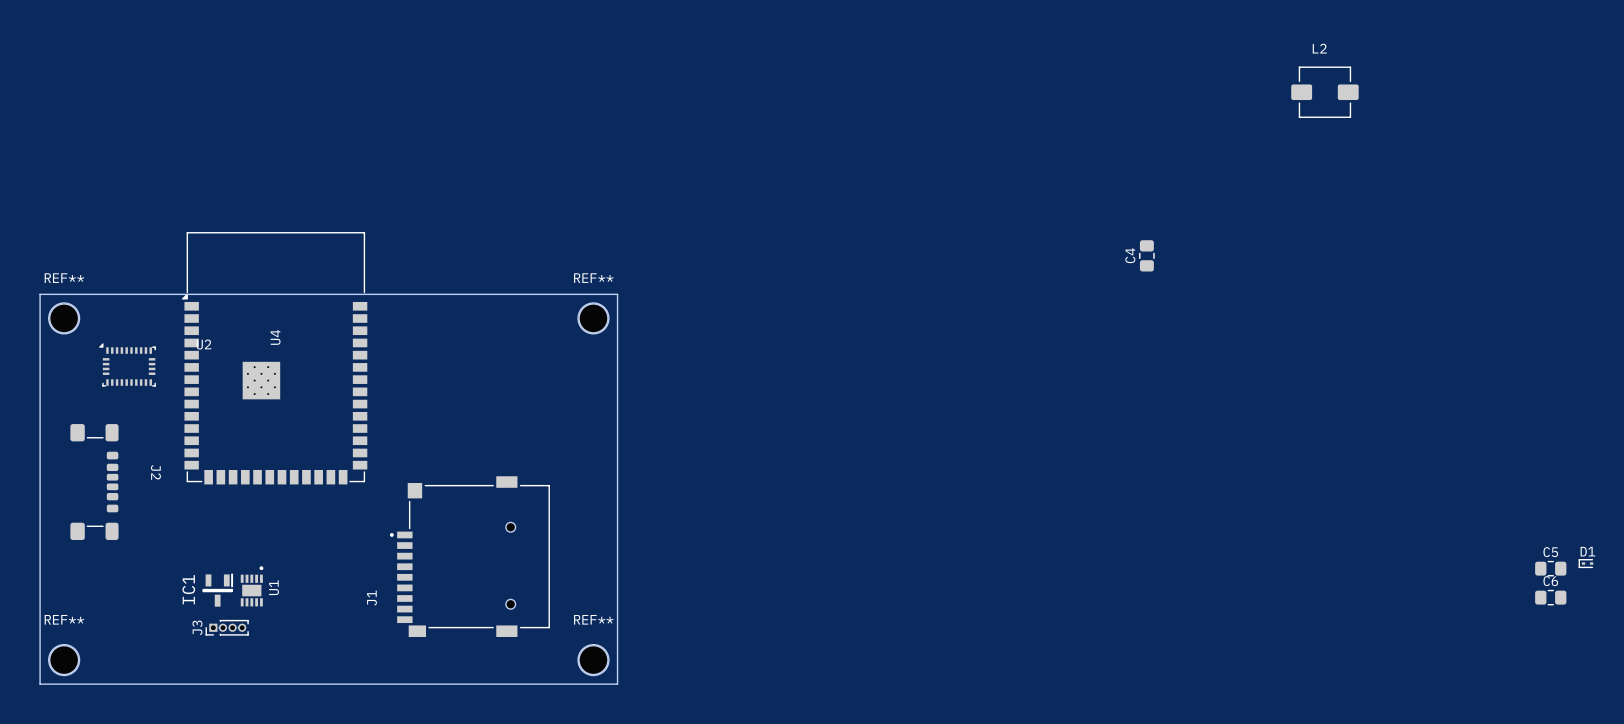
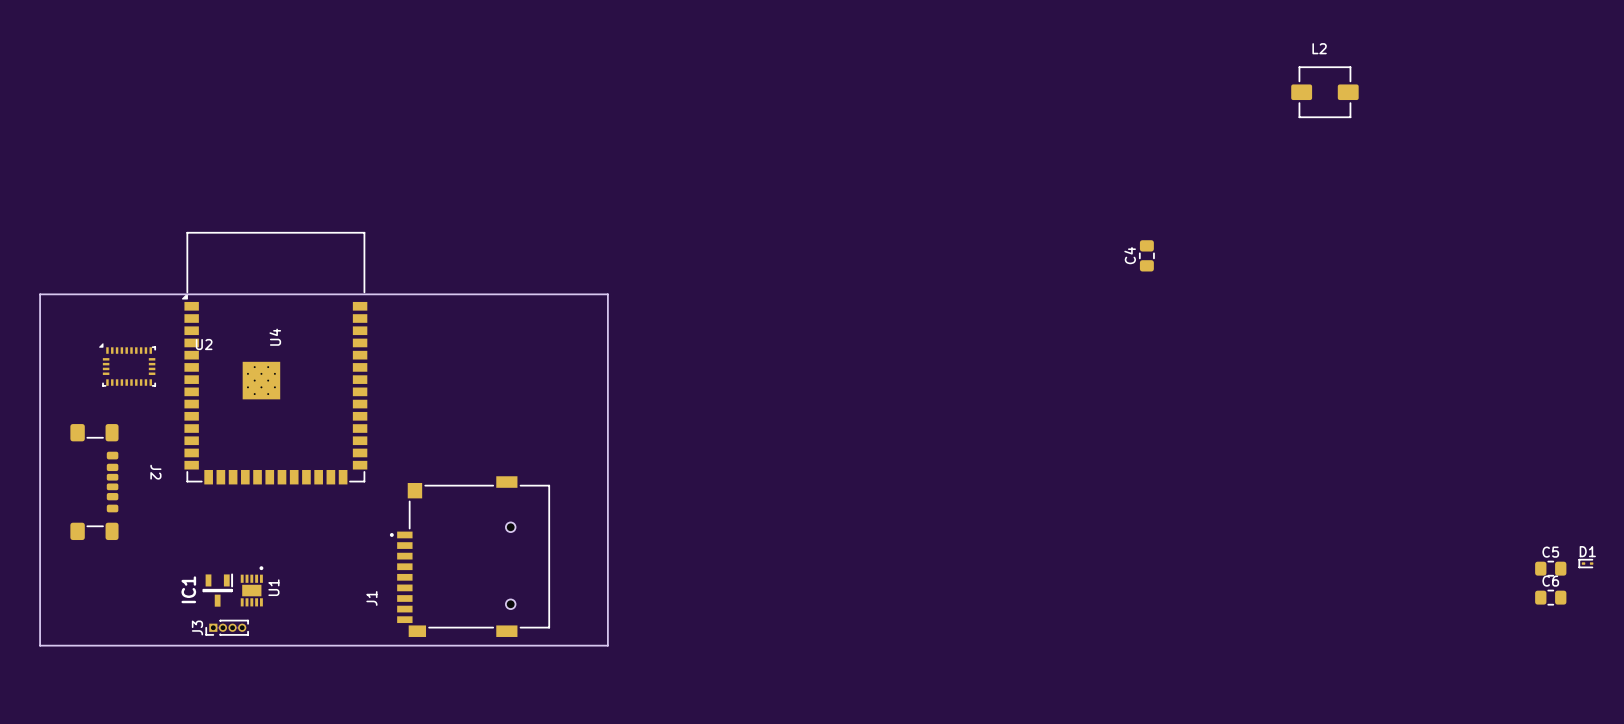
board edge: (607, 294) (617, 294) (617, 684) (40, 684) (40, 645) -> (607, 294) (607, 645) (40, 645)
round board edge: [49, 303, 79, 334] -> none
round board edge: [578, 303, 609, 334] -> none
REF**: (64, 318) -> none
REF**: (593, 318) -> none
round board edge: [49, 645, 79, 675] -> none
round board edge: [578, 645, 609, 675] -> none
REF**: (64, 660) -> none
REF**: (593, 660) -> none

